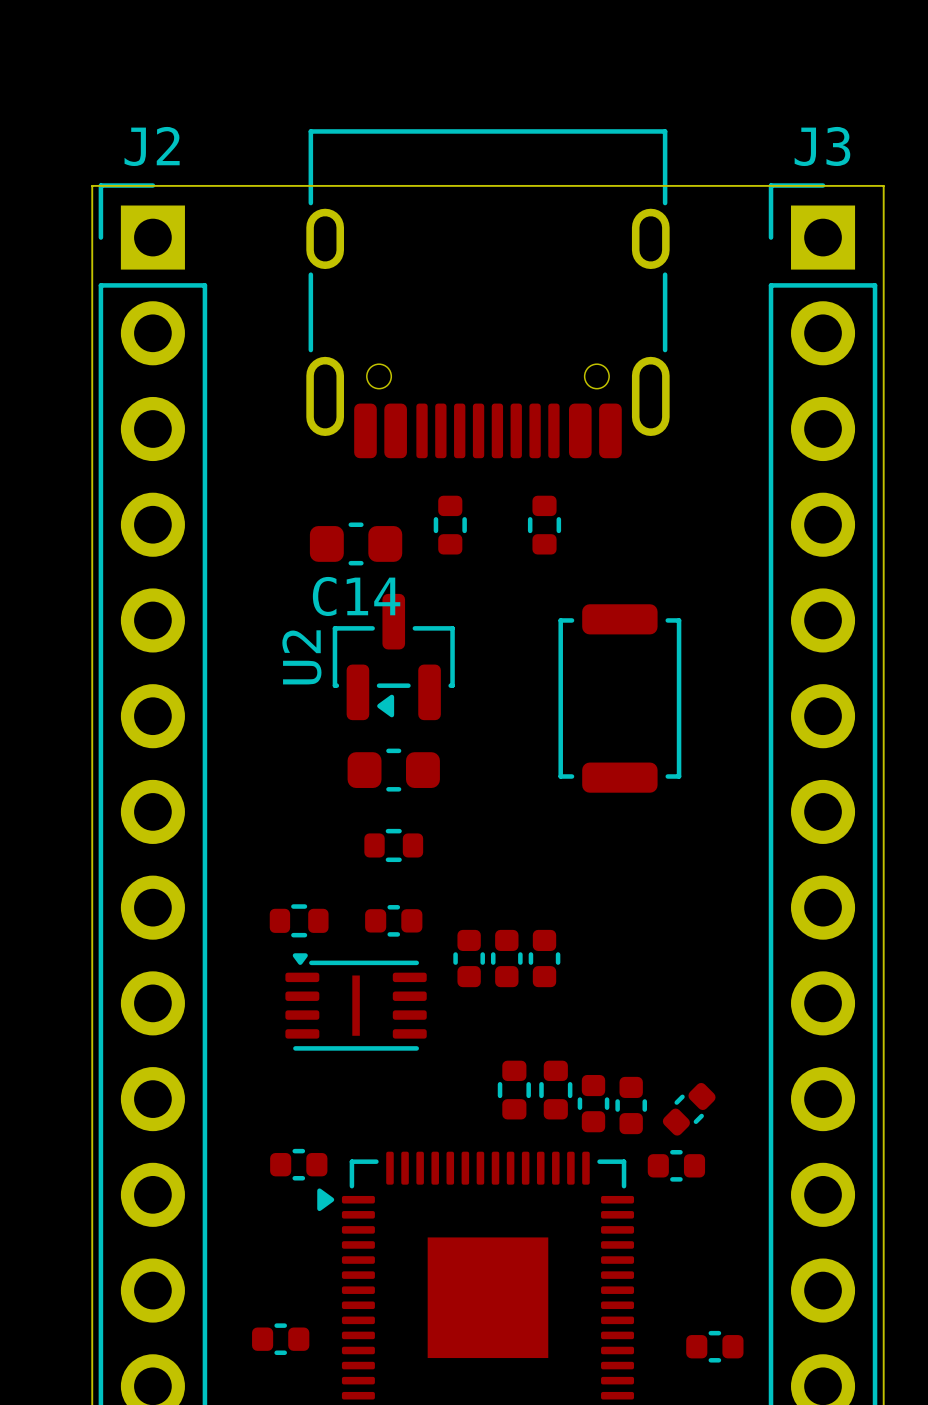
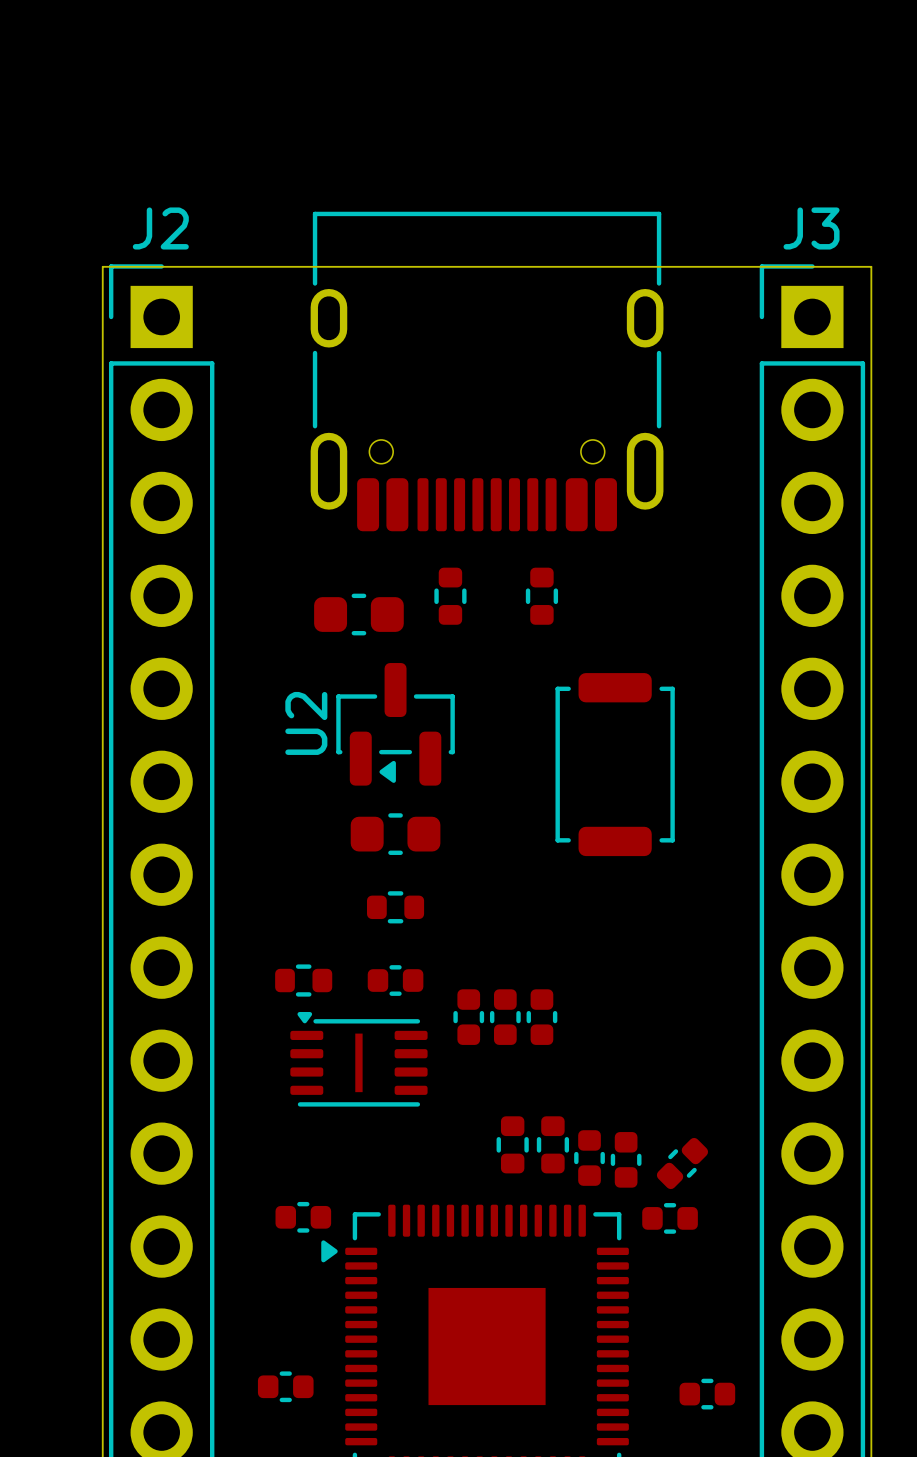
C14 name: C14 (356, 596) -> none

